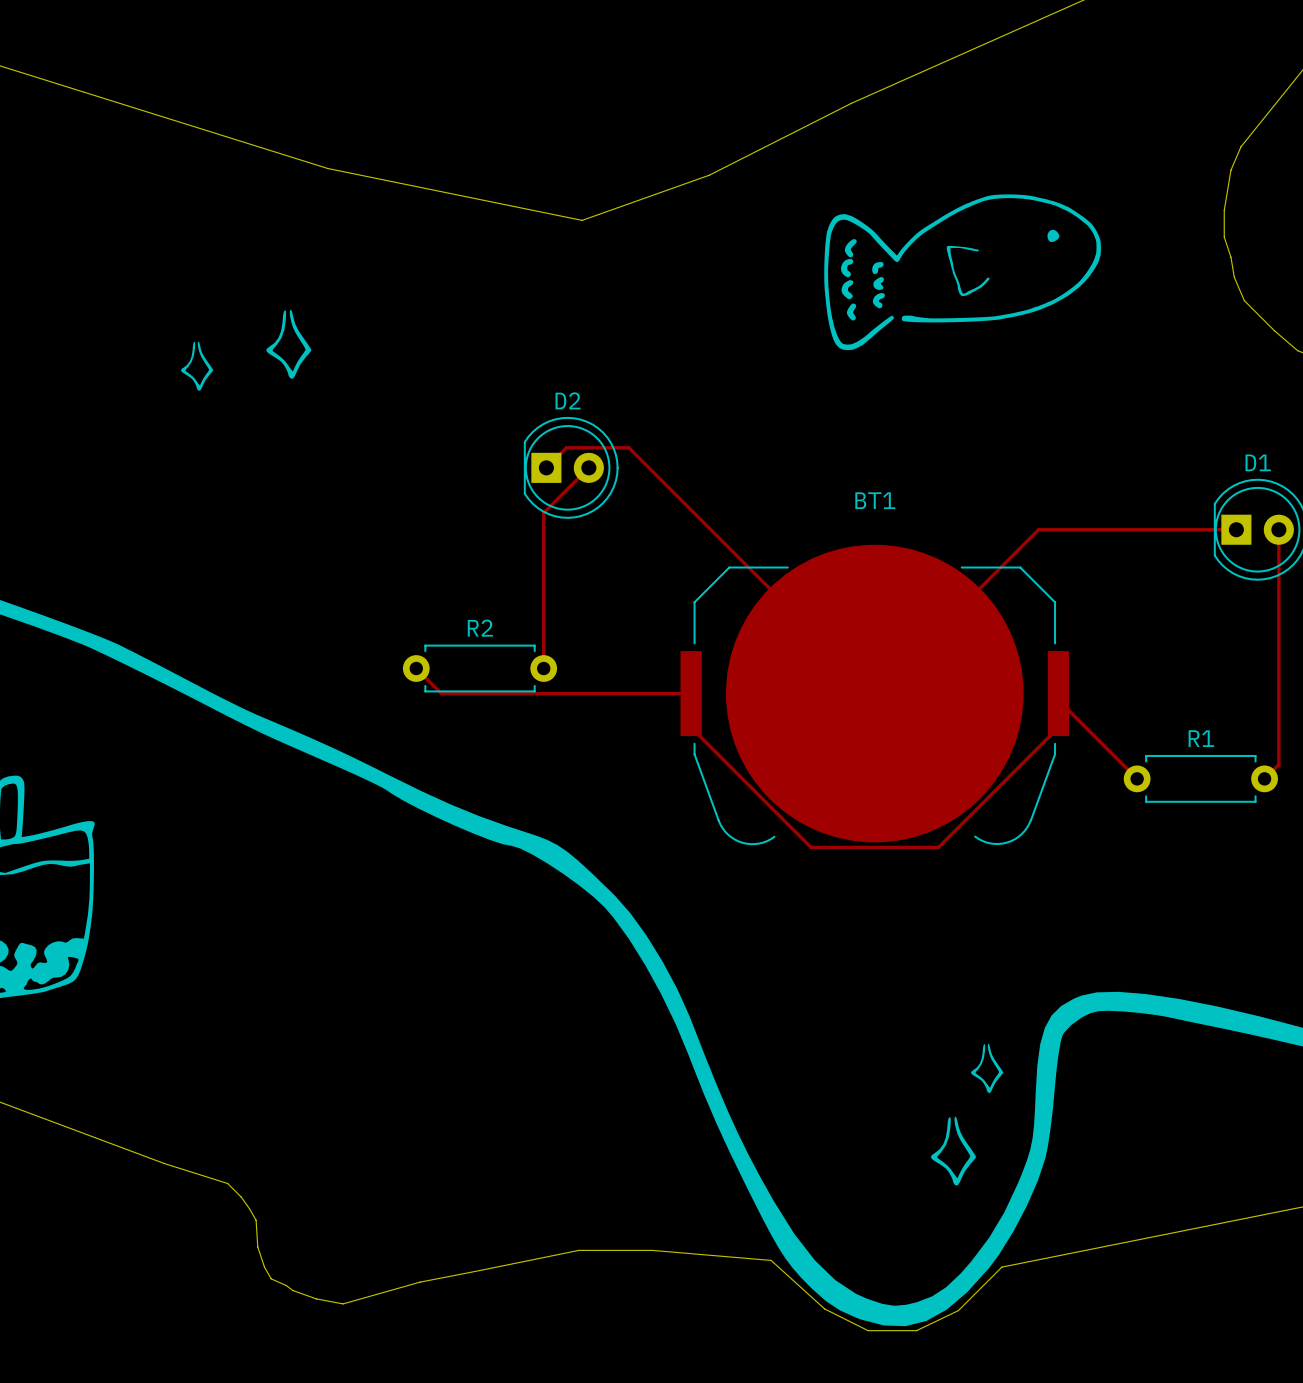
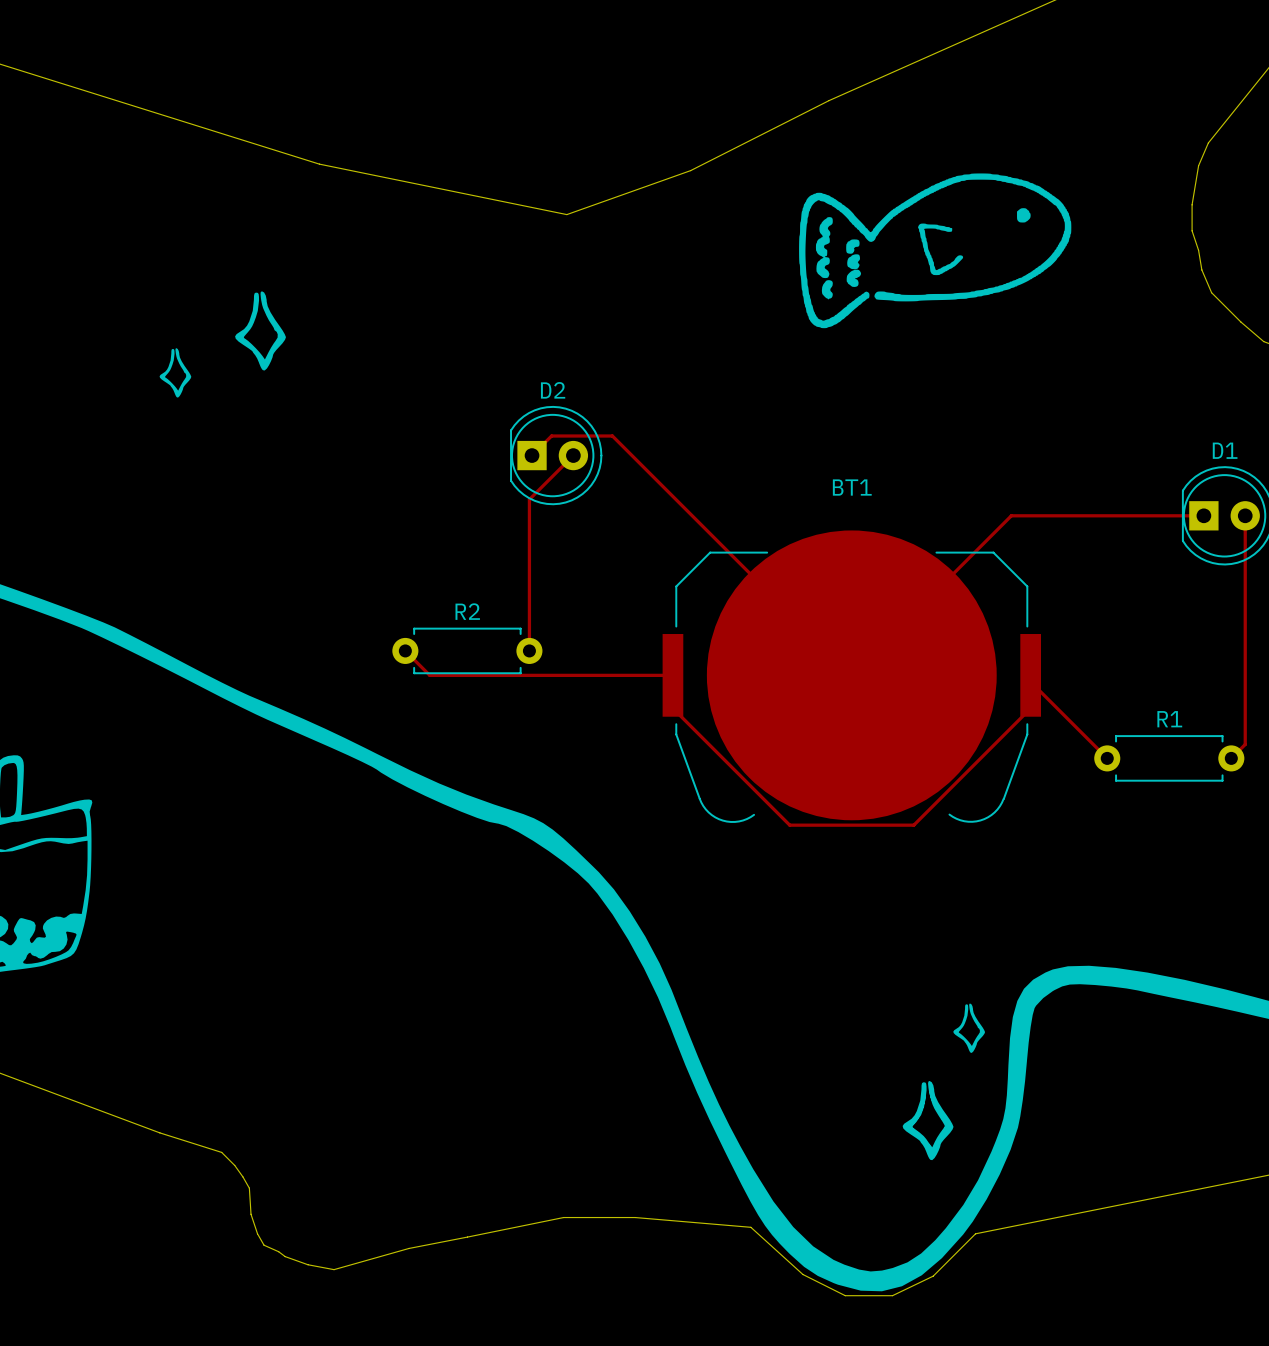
drawing shape: [824, 194, 1101, 351] -> [799, 173, 1072, 329]
drawing: none -> [235, 291, 286, 371]
drawing: [266, 309, 312, 379] -> none
drawing: [181, 341, 214, 391] -> none
drawing: none -> [159, 348, 192, 398]
drawing shape: [971, 1043, 1004, 1094] -> [953, 1003, 986, 1053]
drawing: none -> [902, 1081, 954, 1161]

